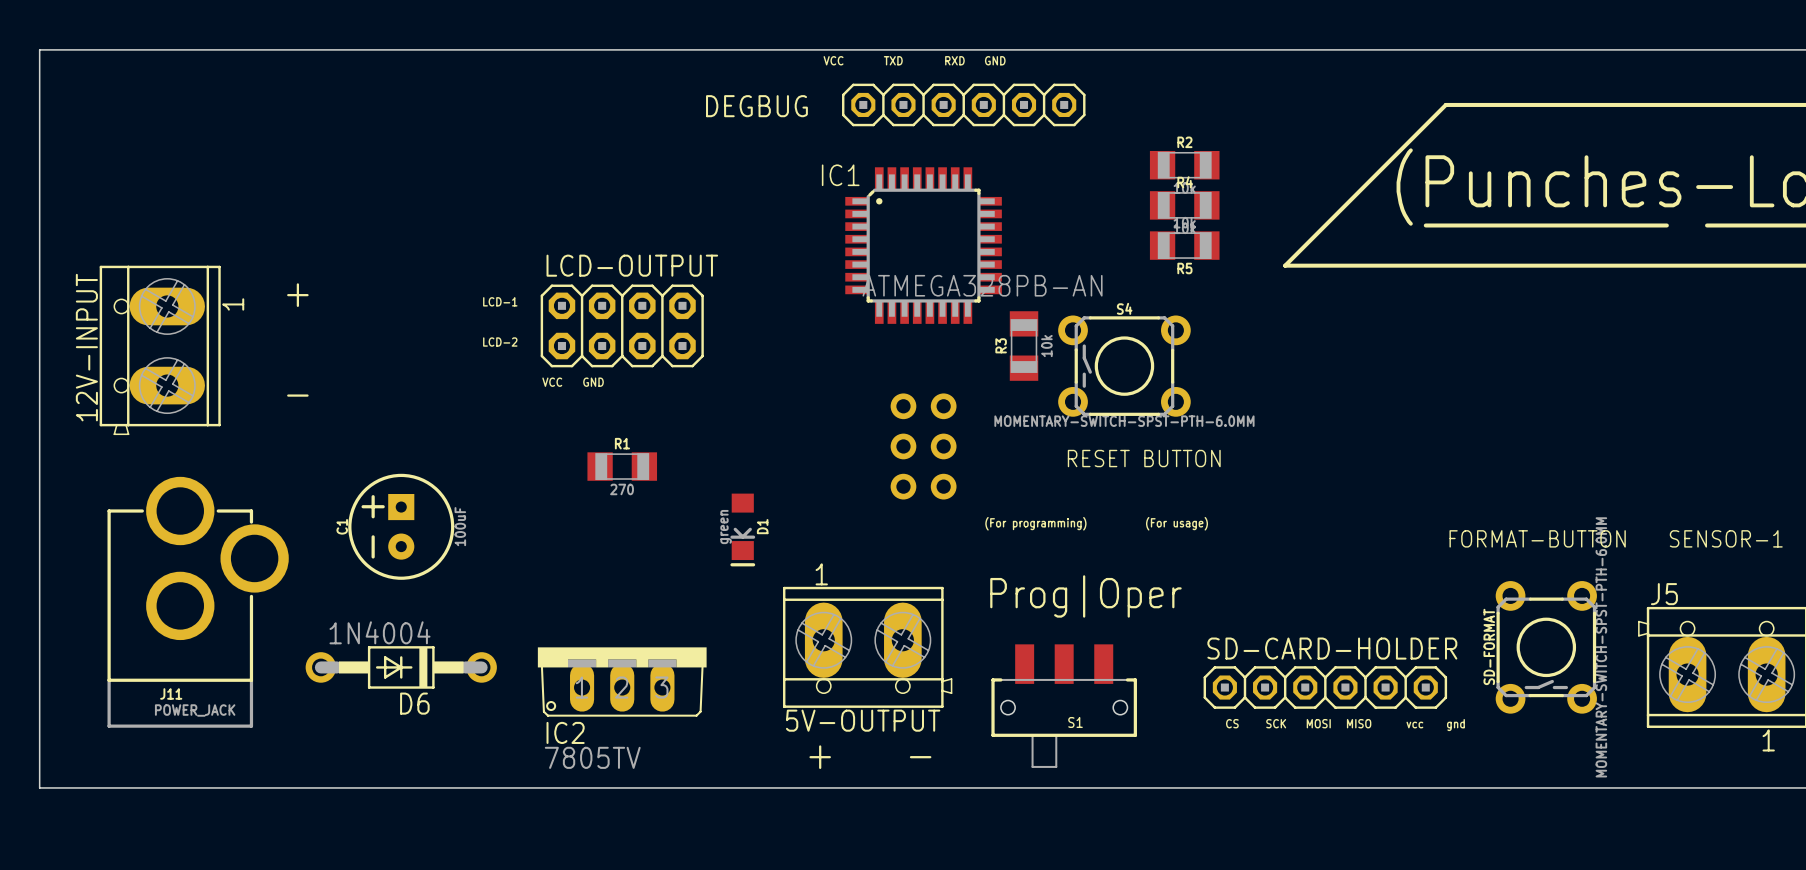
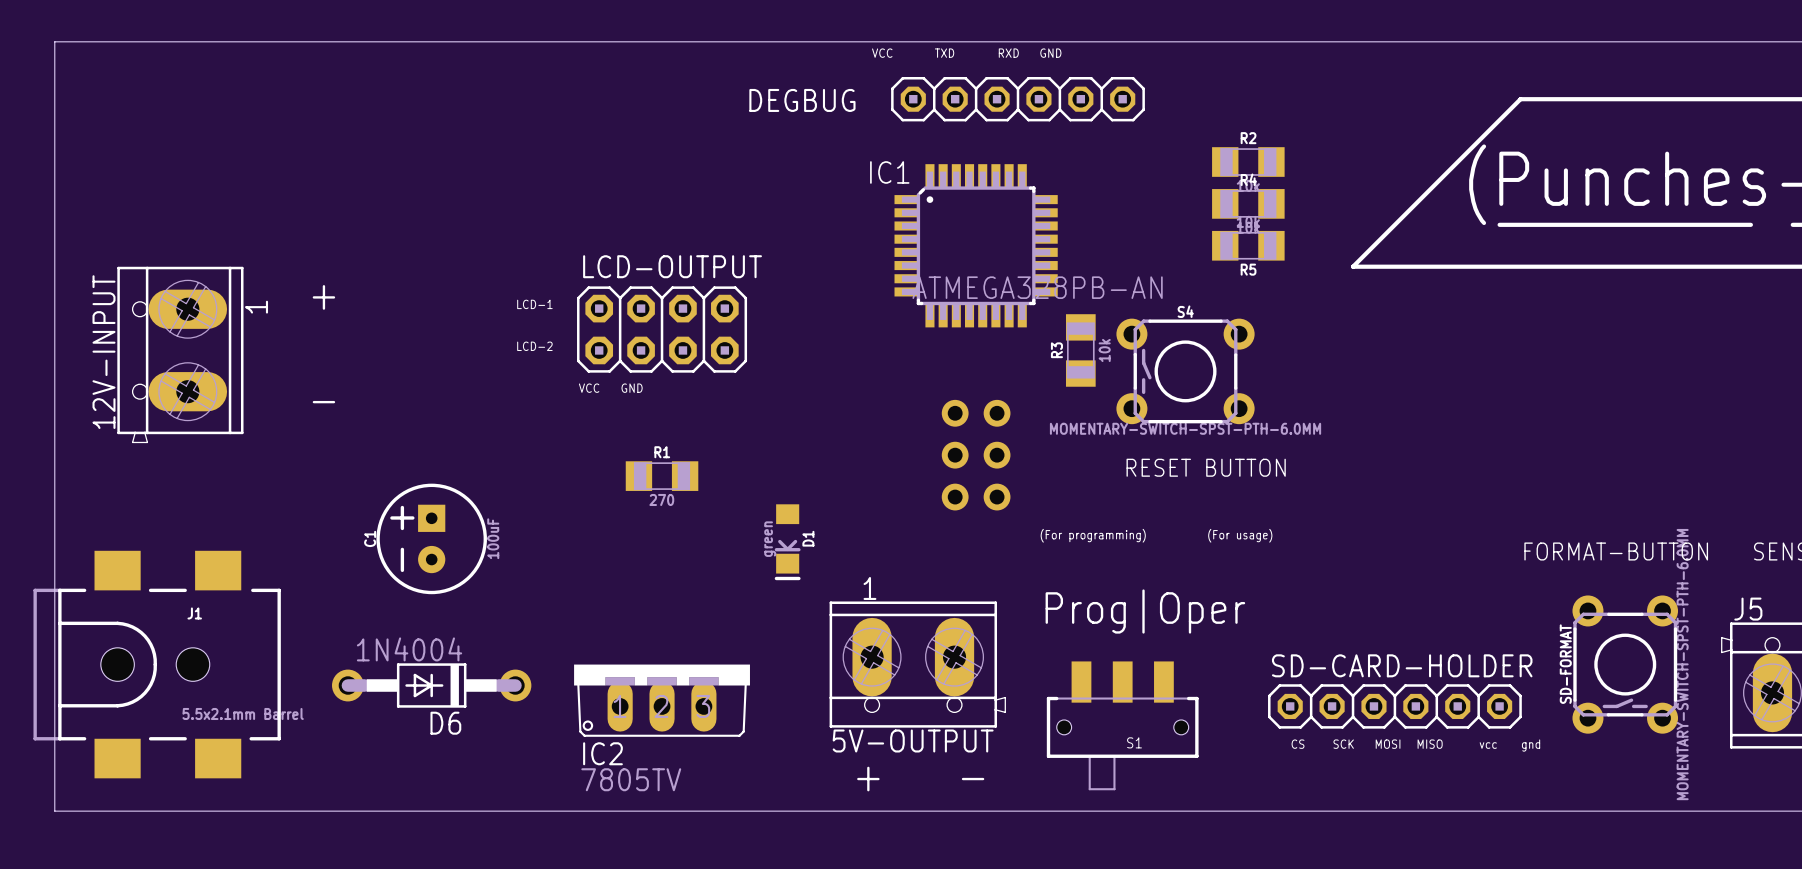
J11: POWER_JACK (198, 602) -> none
J1: none -> 5.5x2.1mm Barrel (157, 664)

